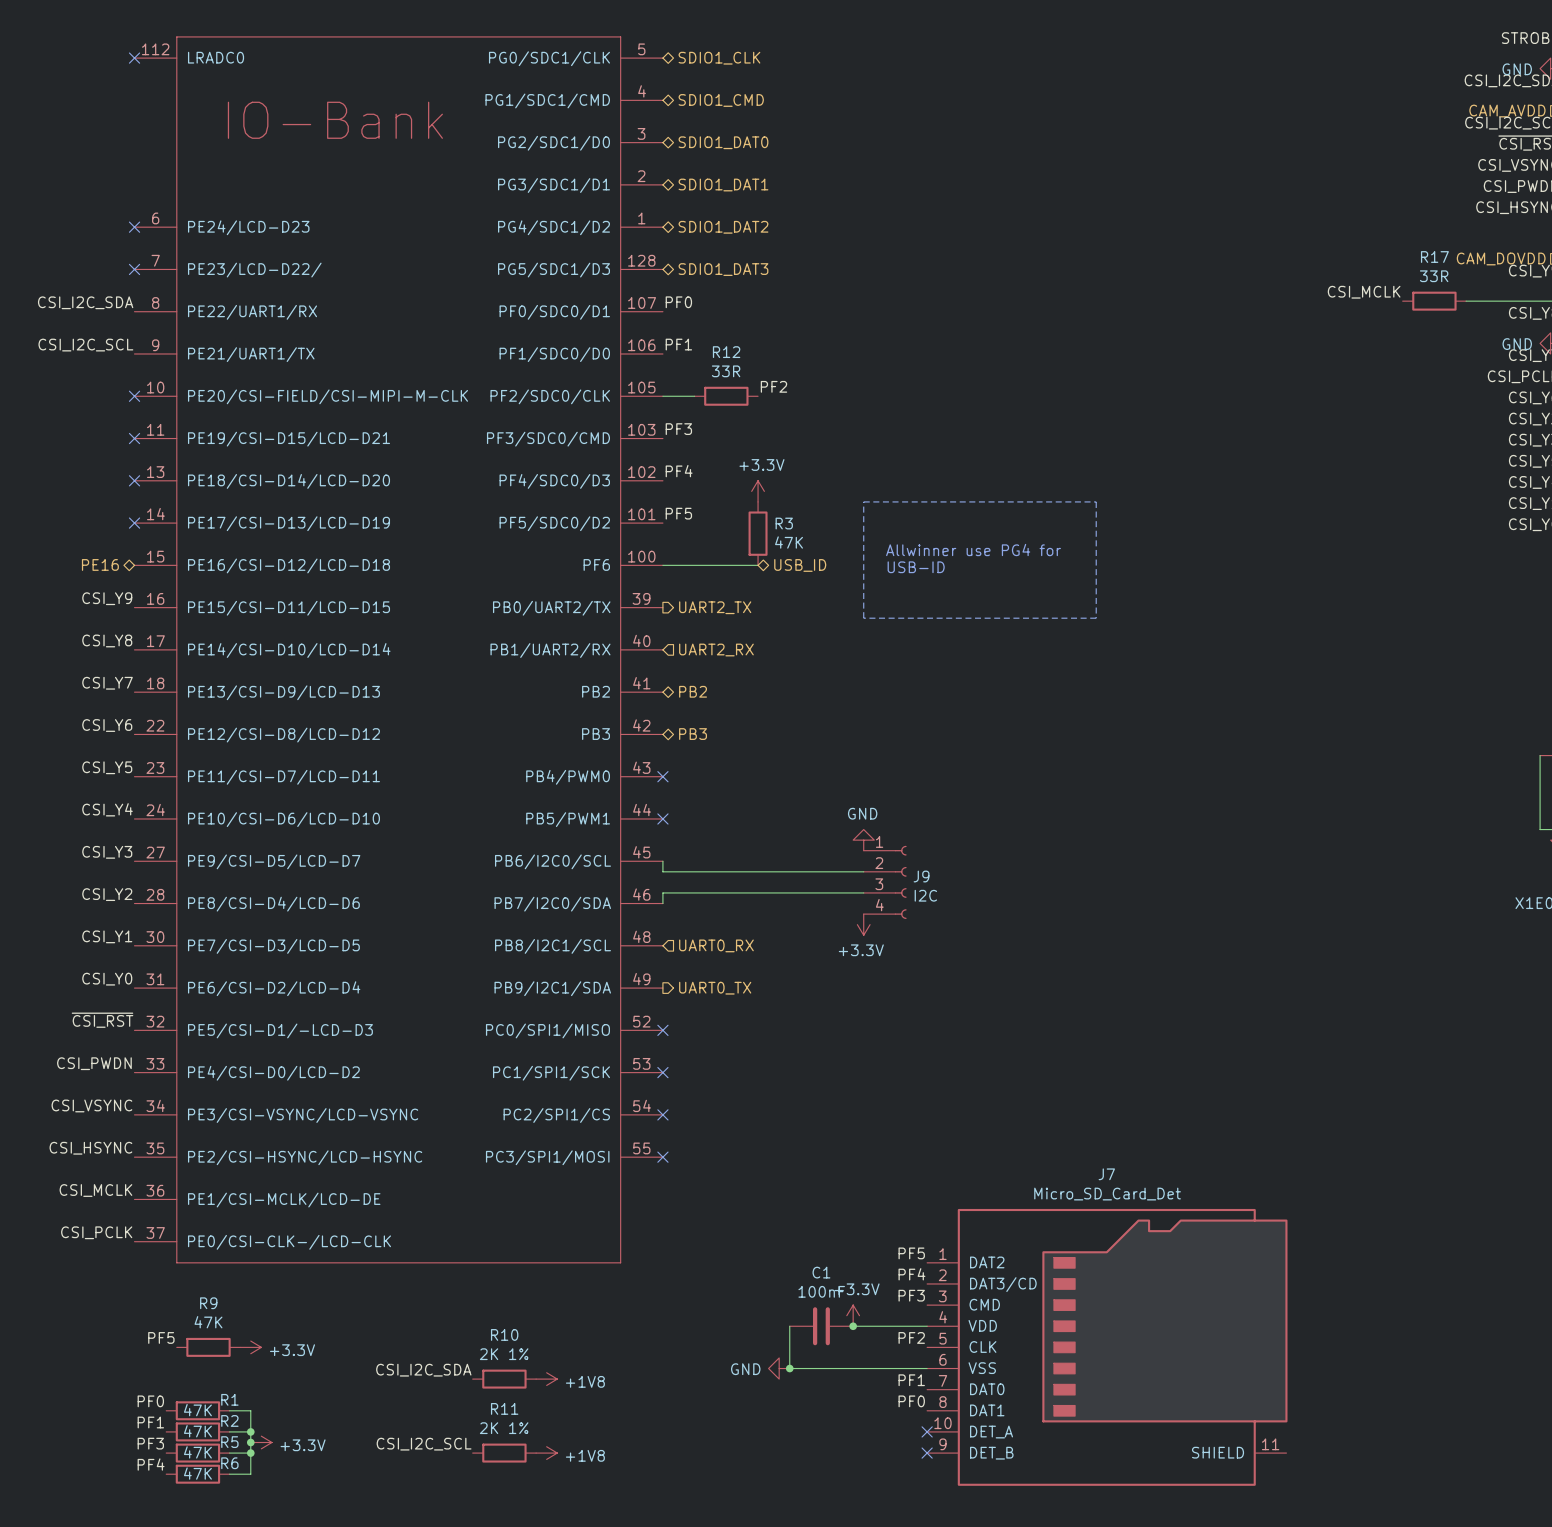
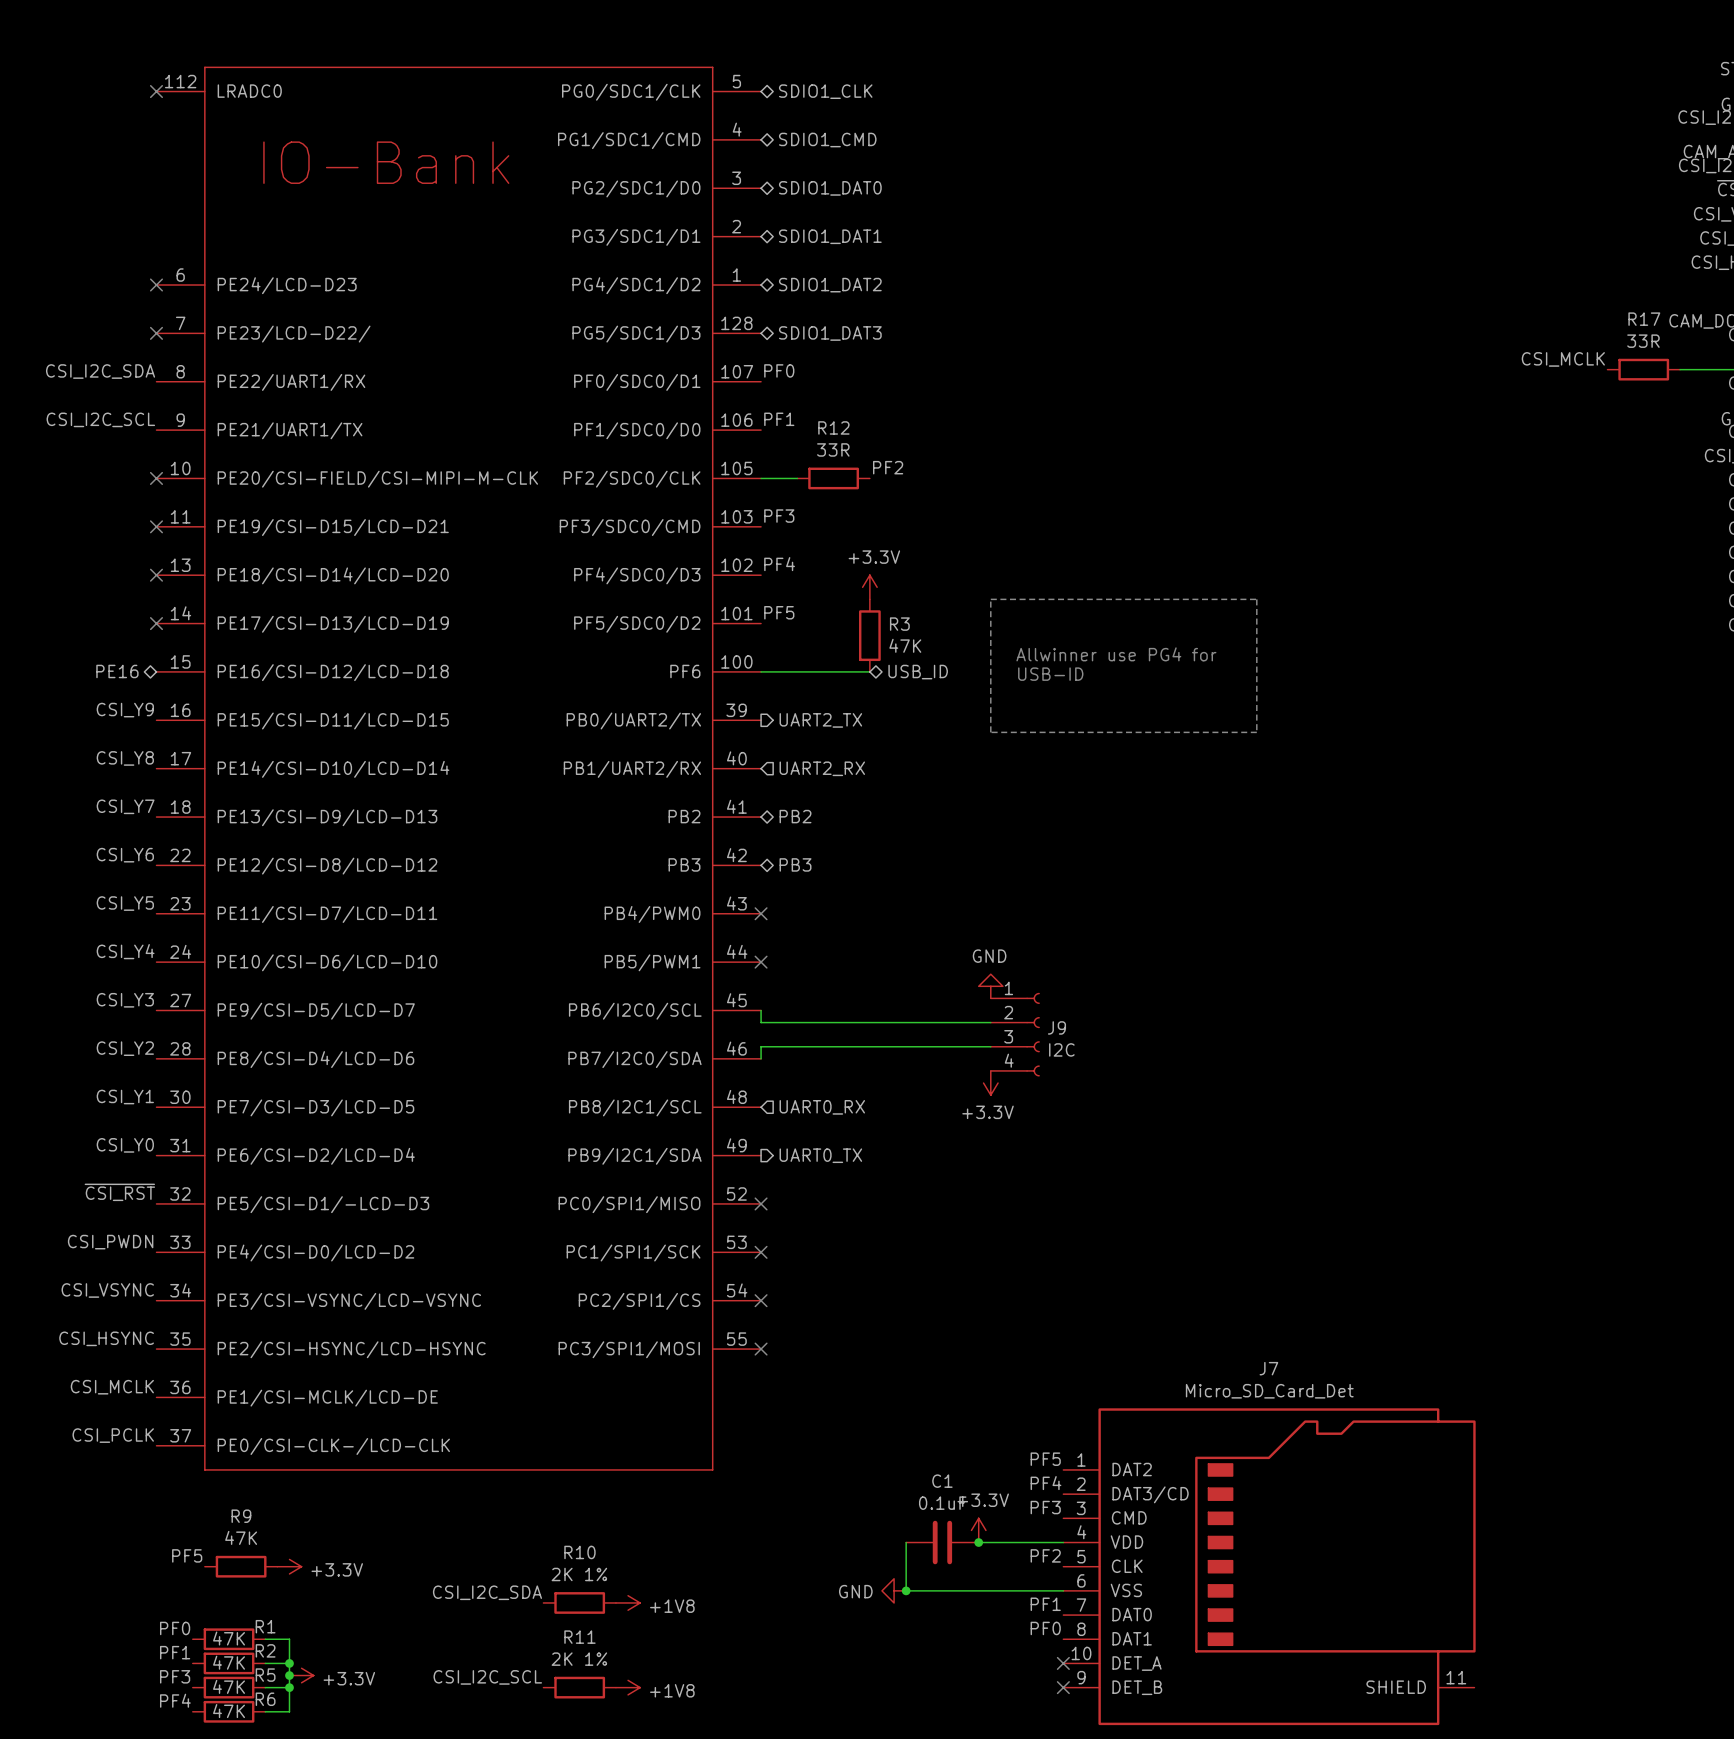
C1 value: 100nF (821, 1291) -> 0.1uF (942, 1503)

